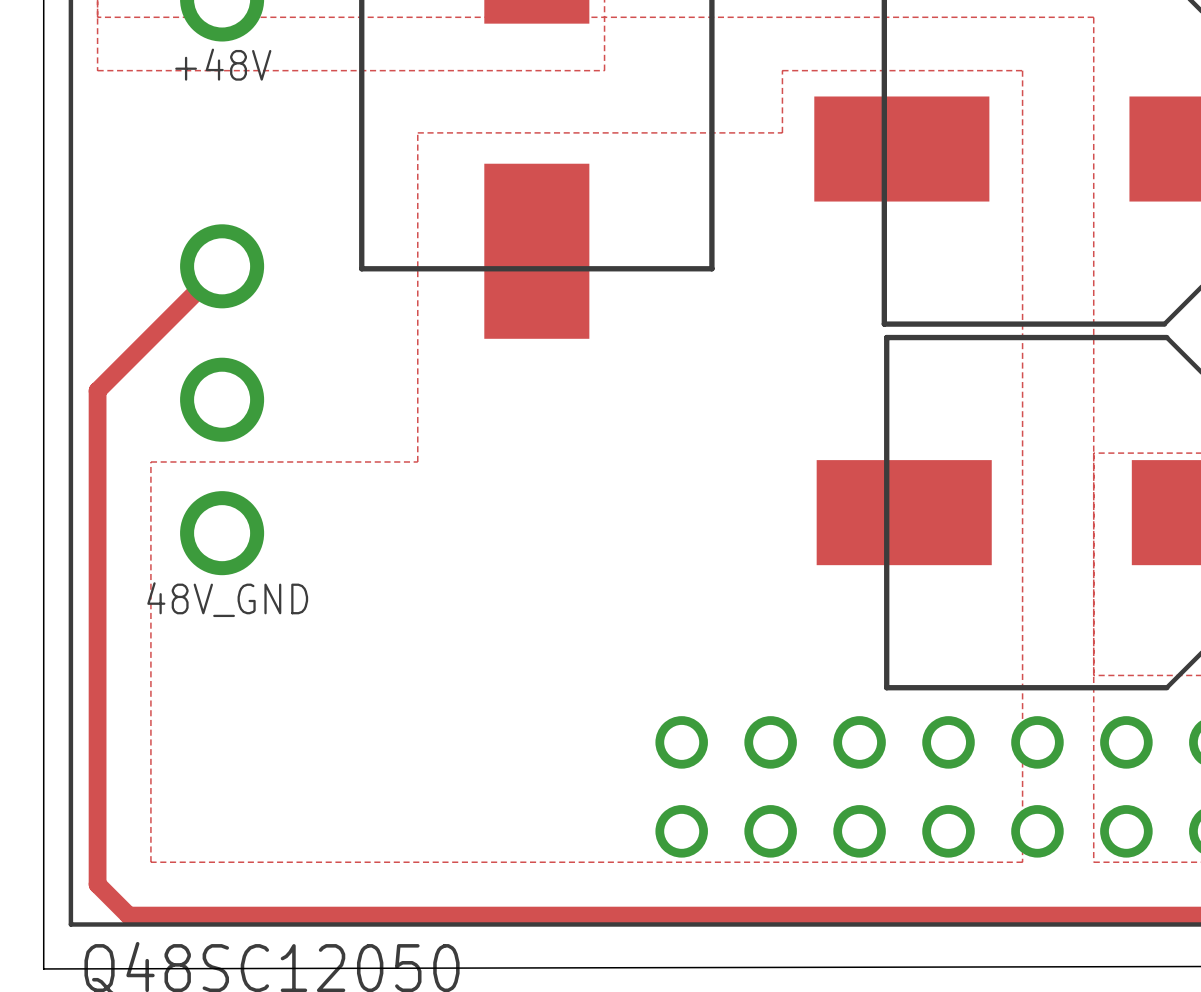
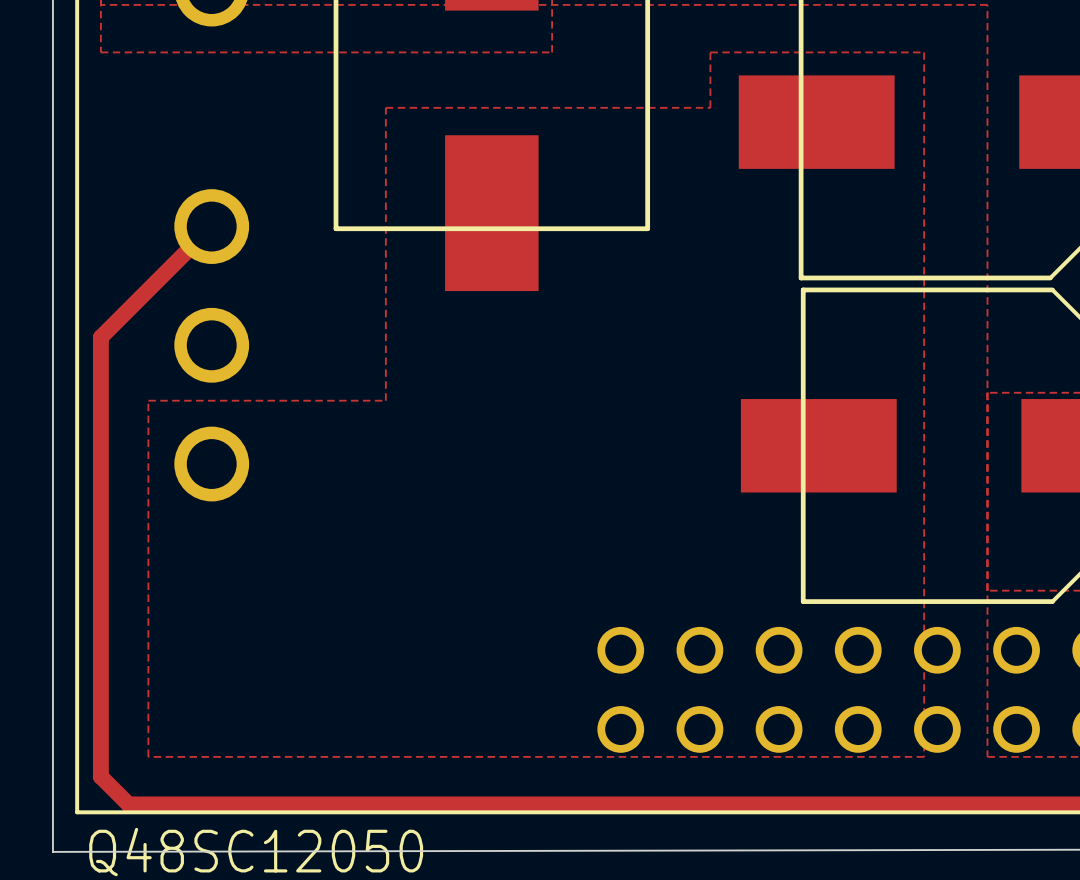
text: +48V (223, 64) -> none
text: 48V_GND (227, 599) -> none

